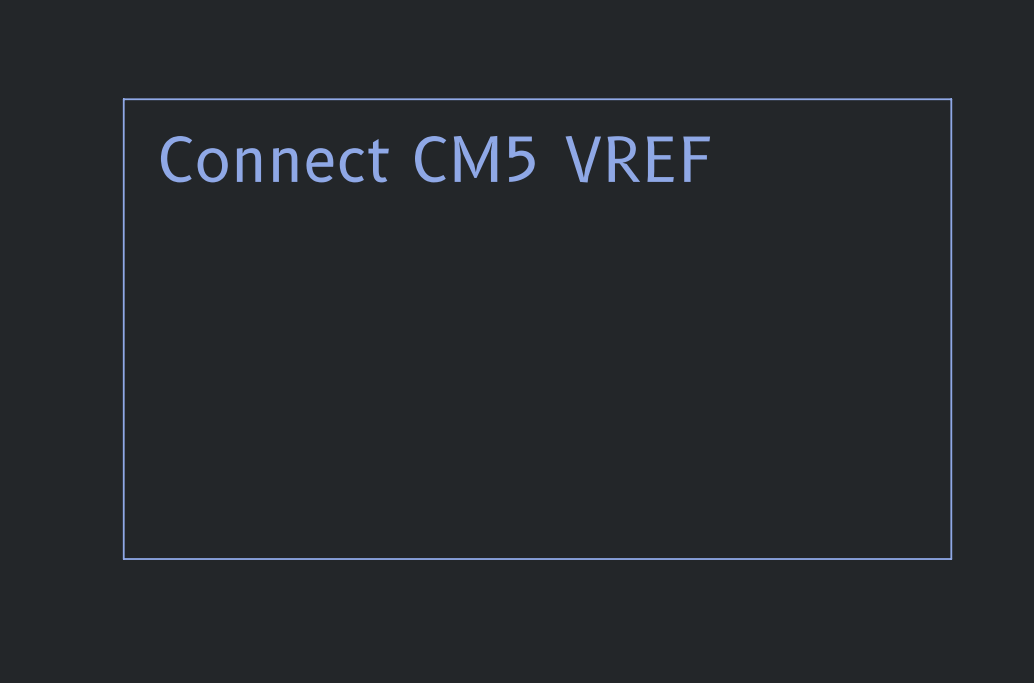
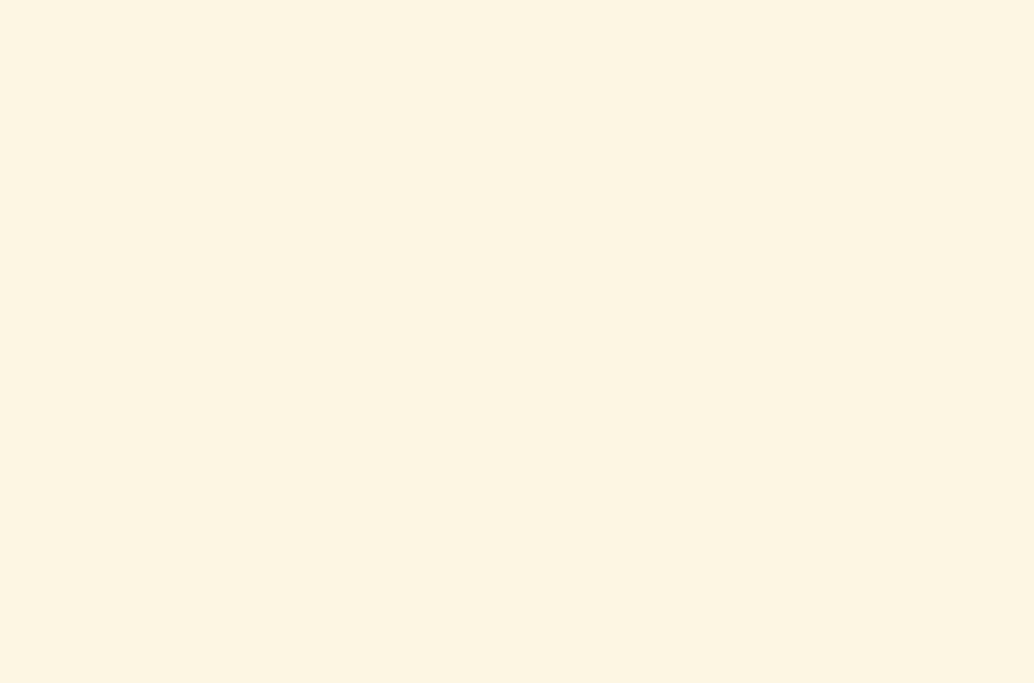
line: (123, 99) (951, 99) (951, 559) (123, 559) (123, 99) -> none
text: Connect CM5 VREF (435, 159) -> none

